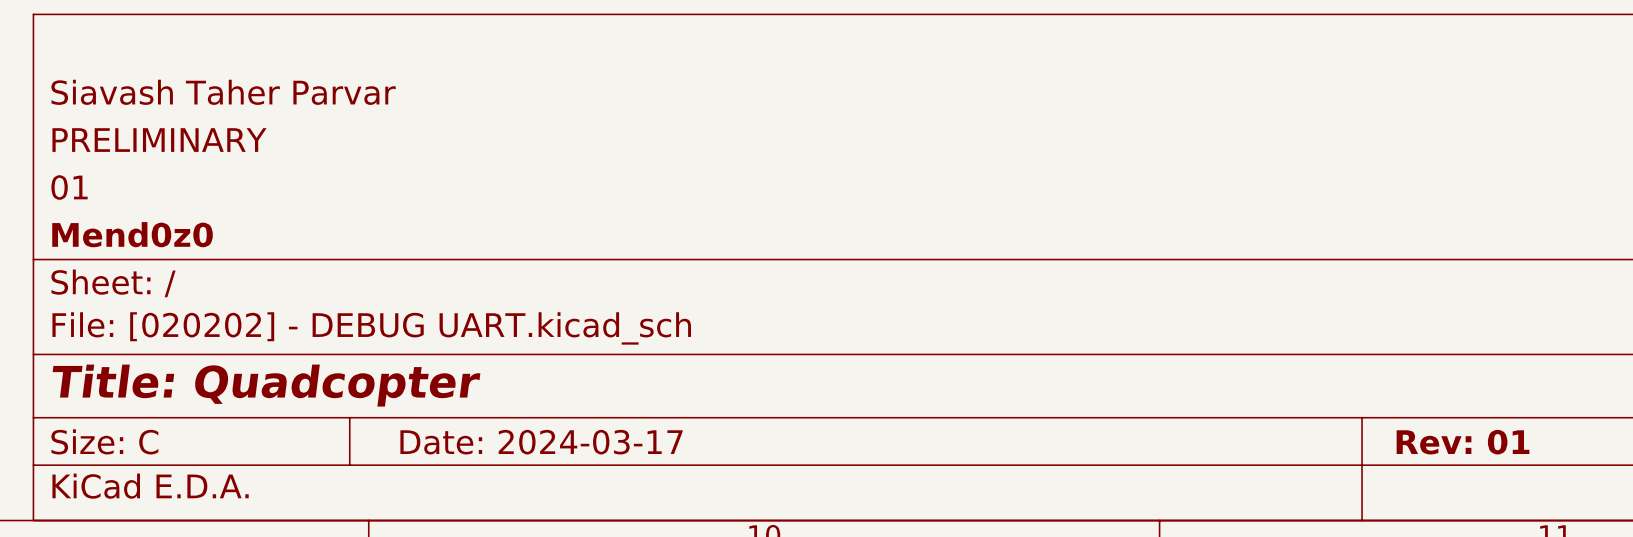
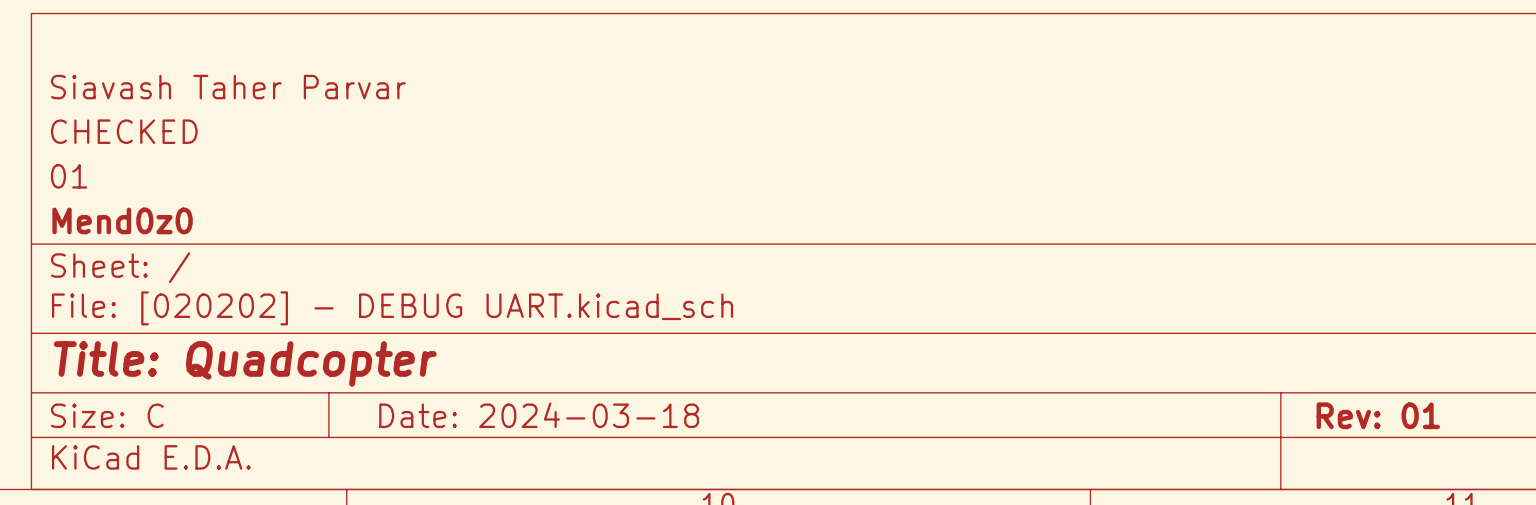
title block: PRELIMINARY (159, 140) -> CHECKED (124, 131)
title block: Date: 2024-03-17 (541, 442) -> Date: 2024-03-18 (539, 415)

